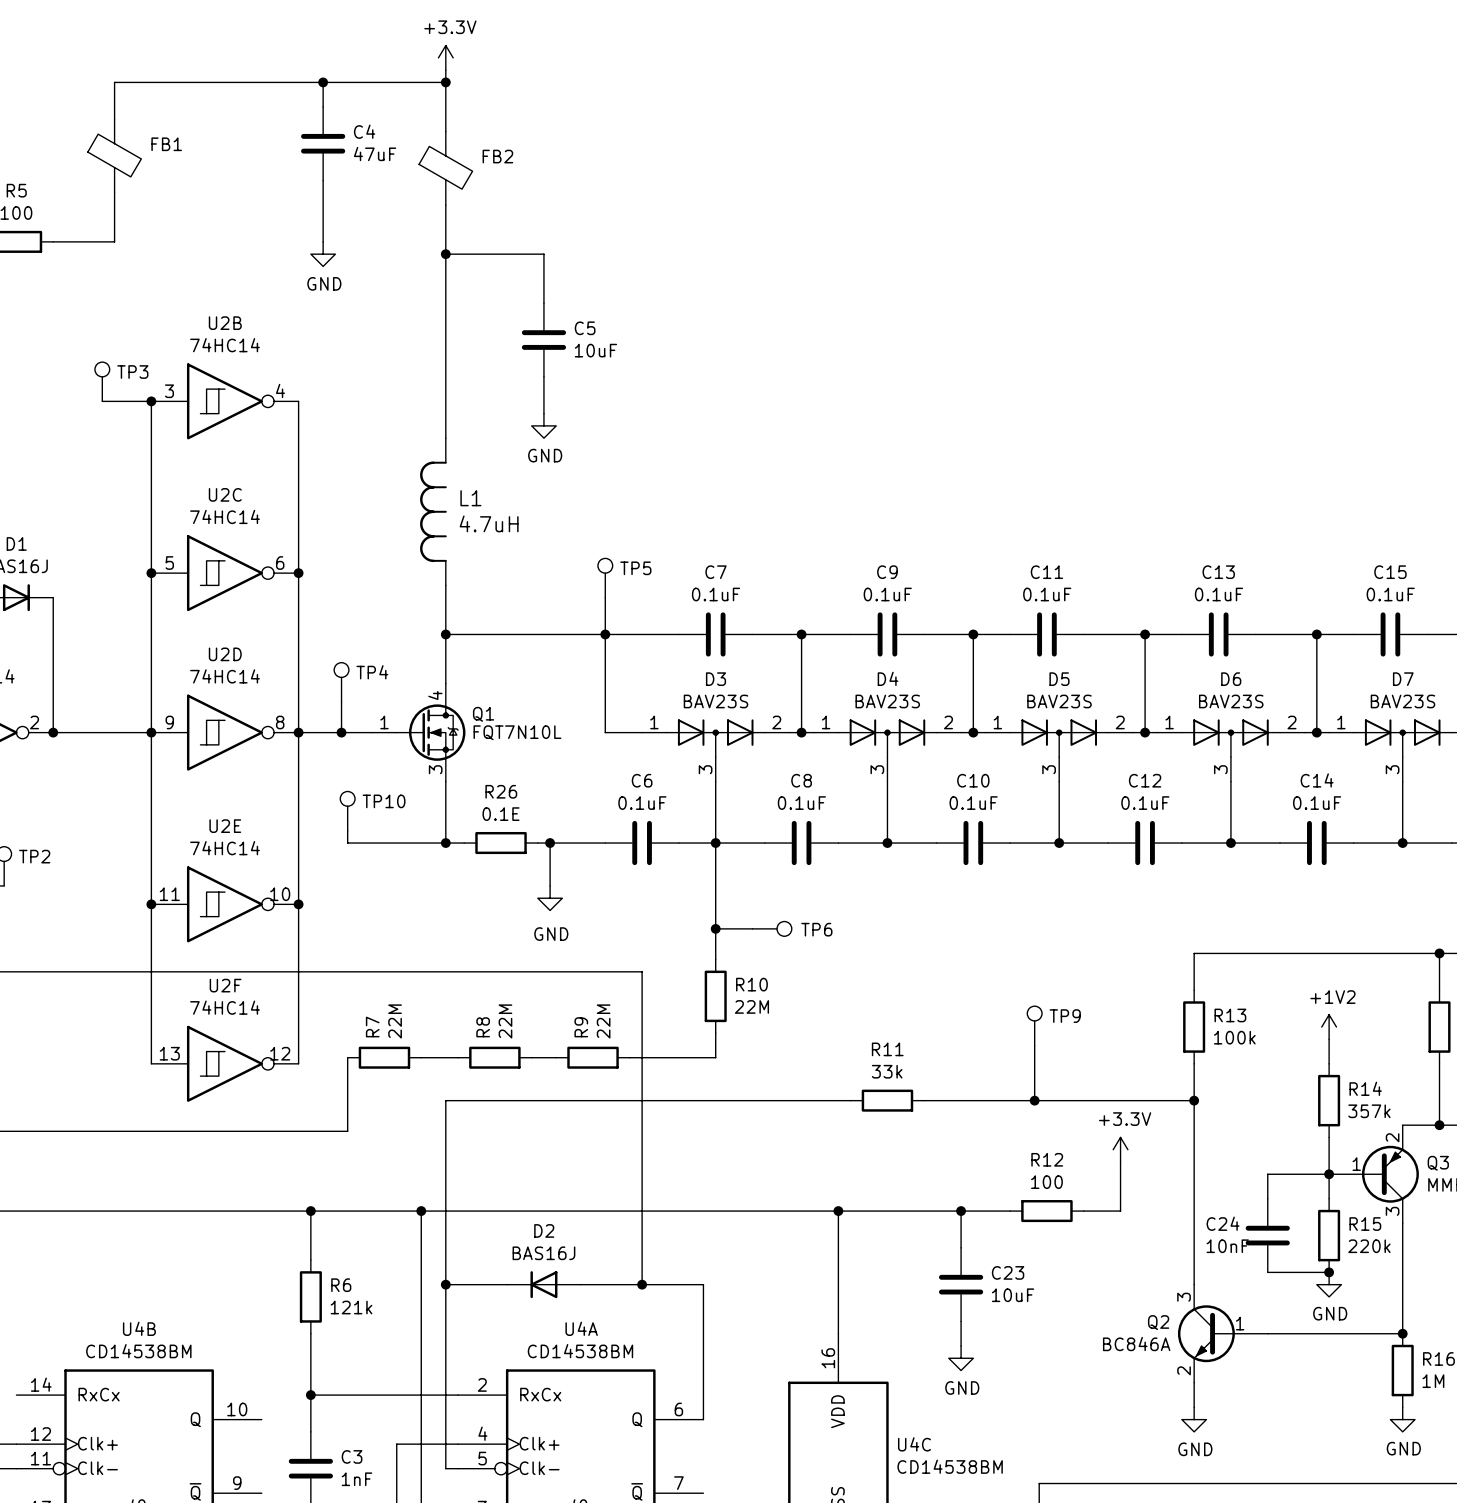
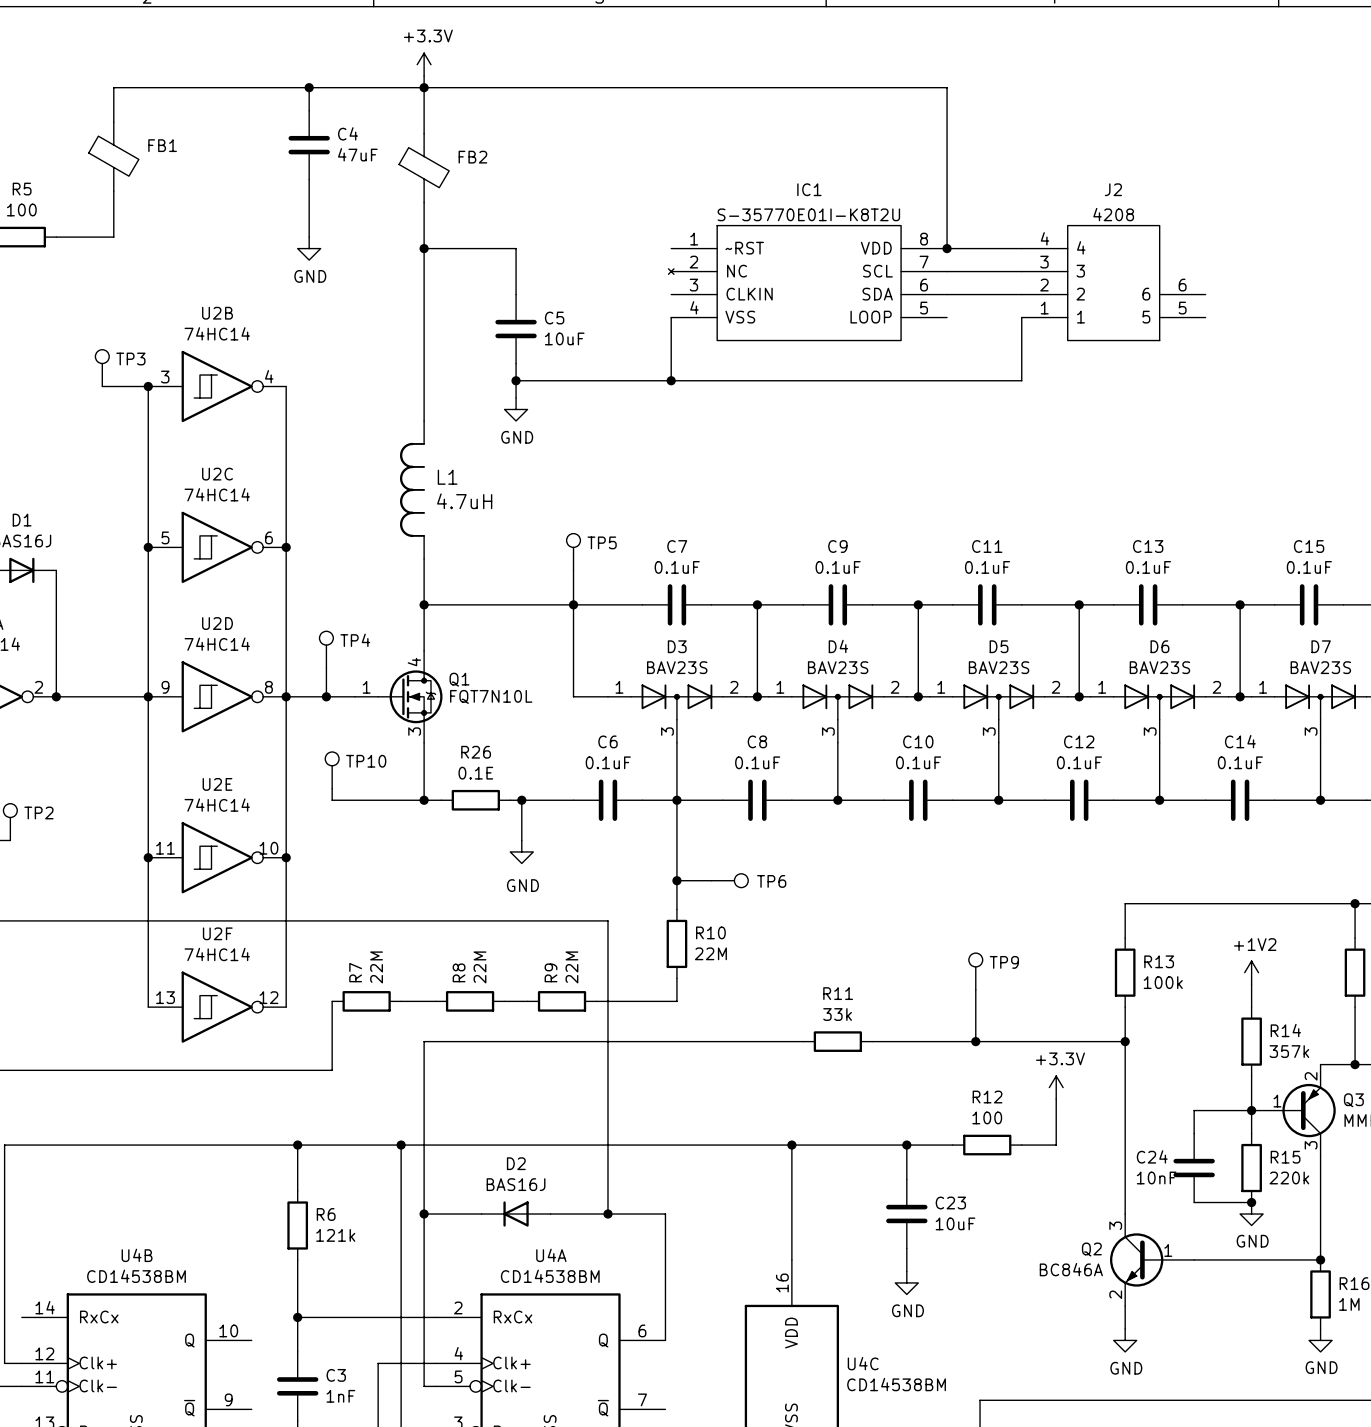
wire: none -> (424, 87) (947, 87) (947, 248) (1021, 248)
junction: none -> (947, 248)
wire: none -> (947, 271) (1021, 271)
IC1: none -> S-35770E01I-K8T2U (807, 283)
J2: none -> 4208 (1113, 283)
wire: none -> (947, 294) (1021, 294)
wire: none -> (671, 317) (671, 380)
wire: none -> (1021, 317) (1021, 380) (516, 380)
junction: none -> (516, 380)
junction: none -> (671, 380)

